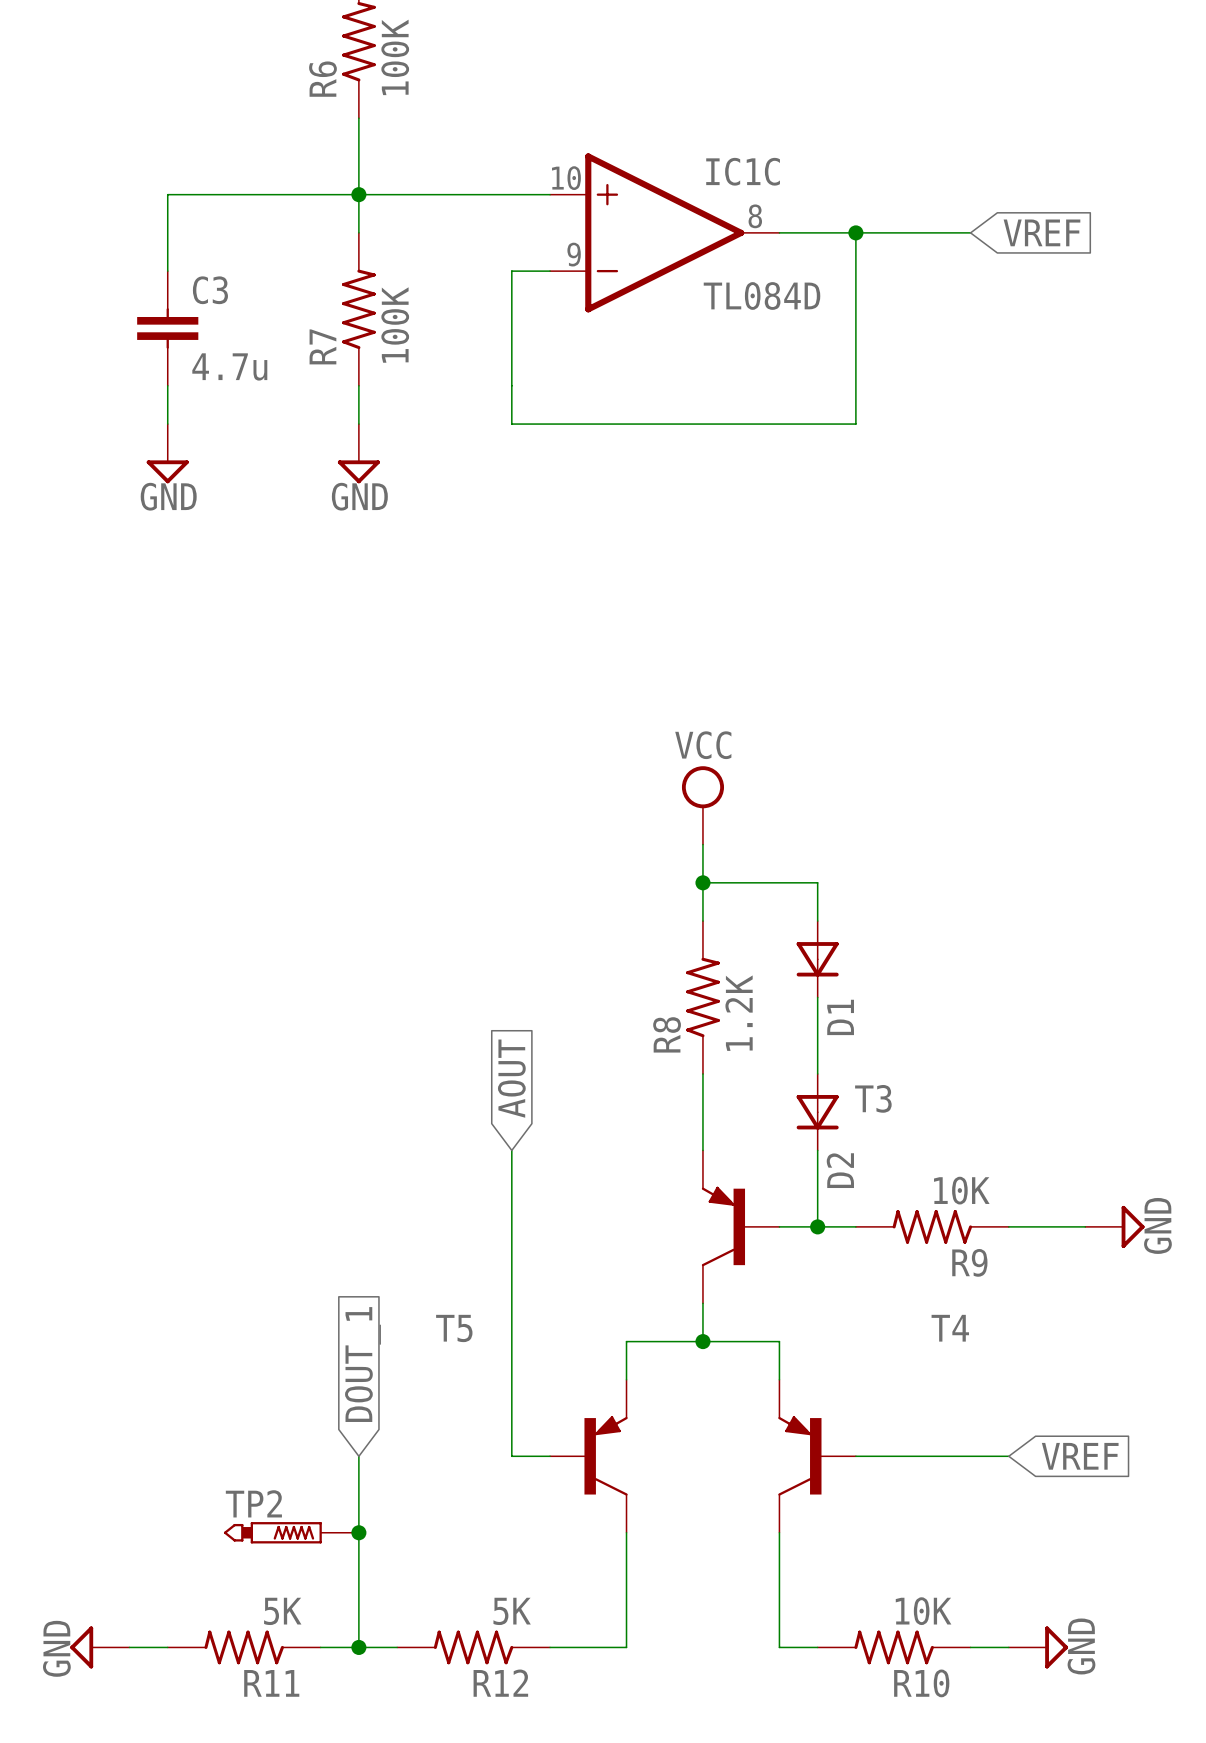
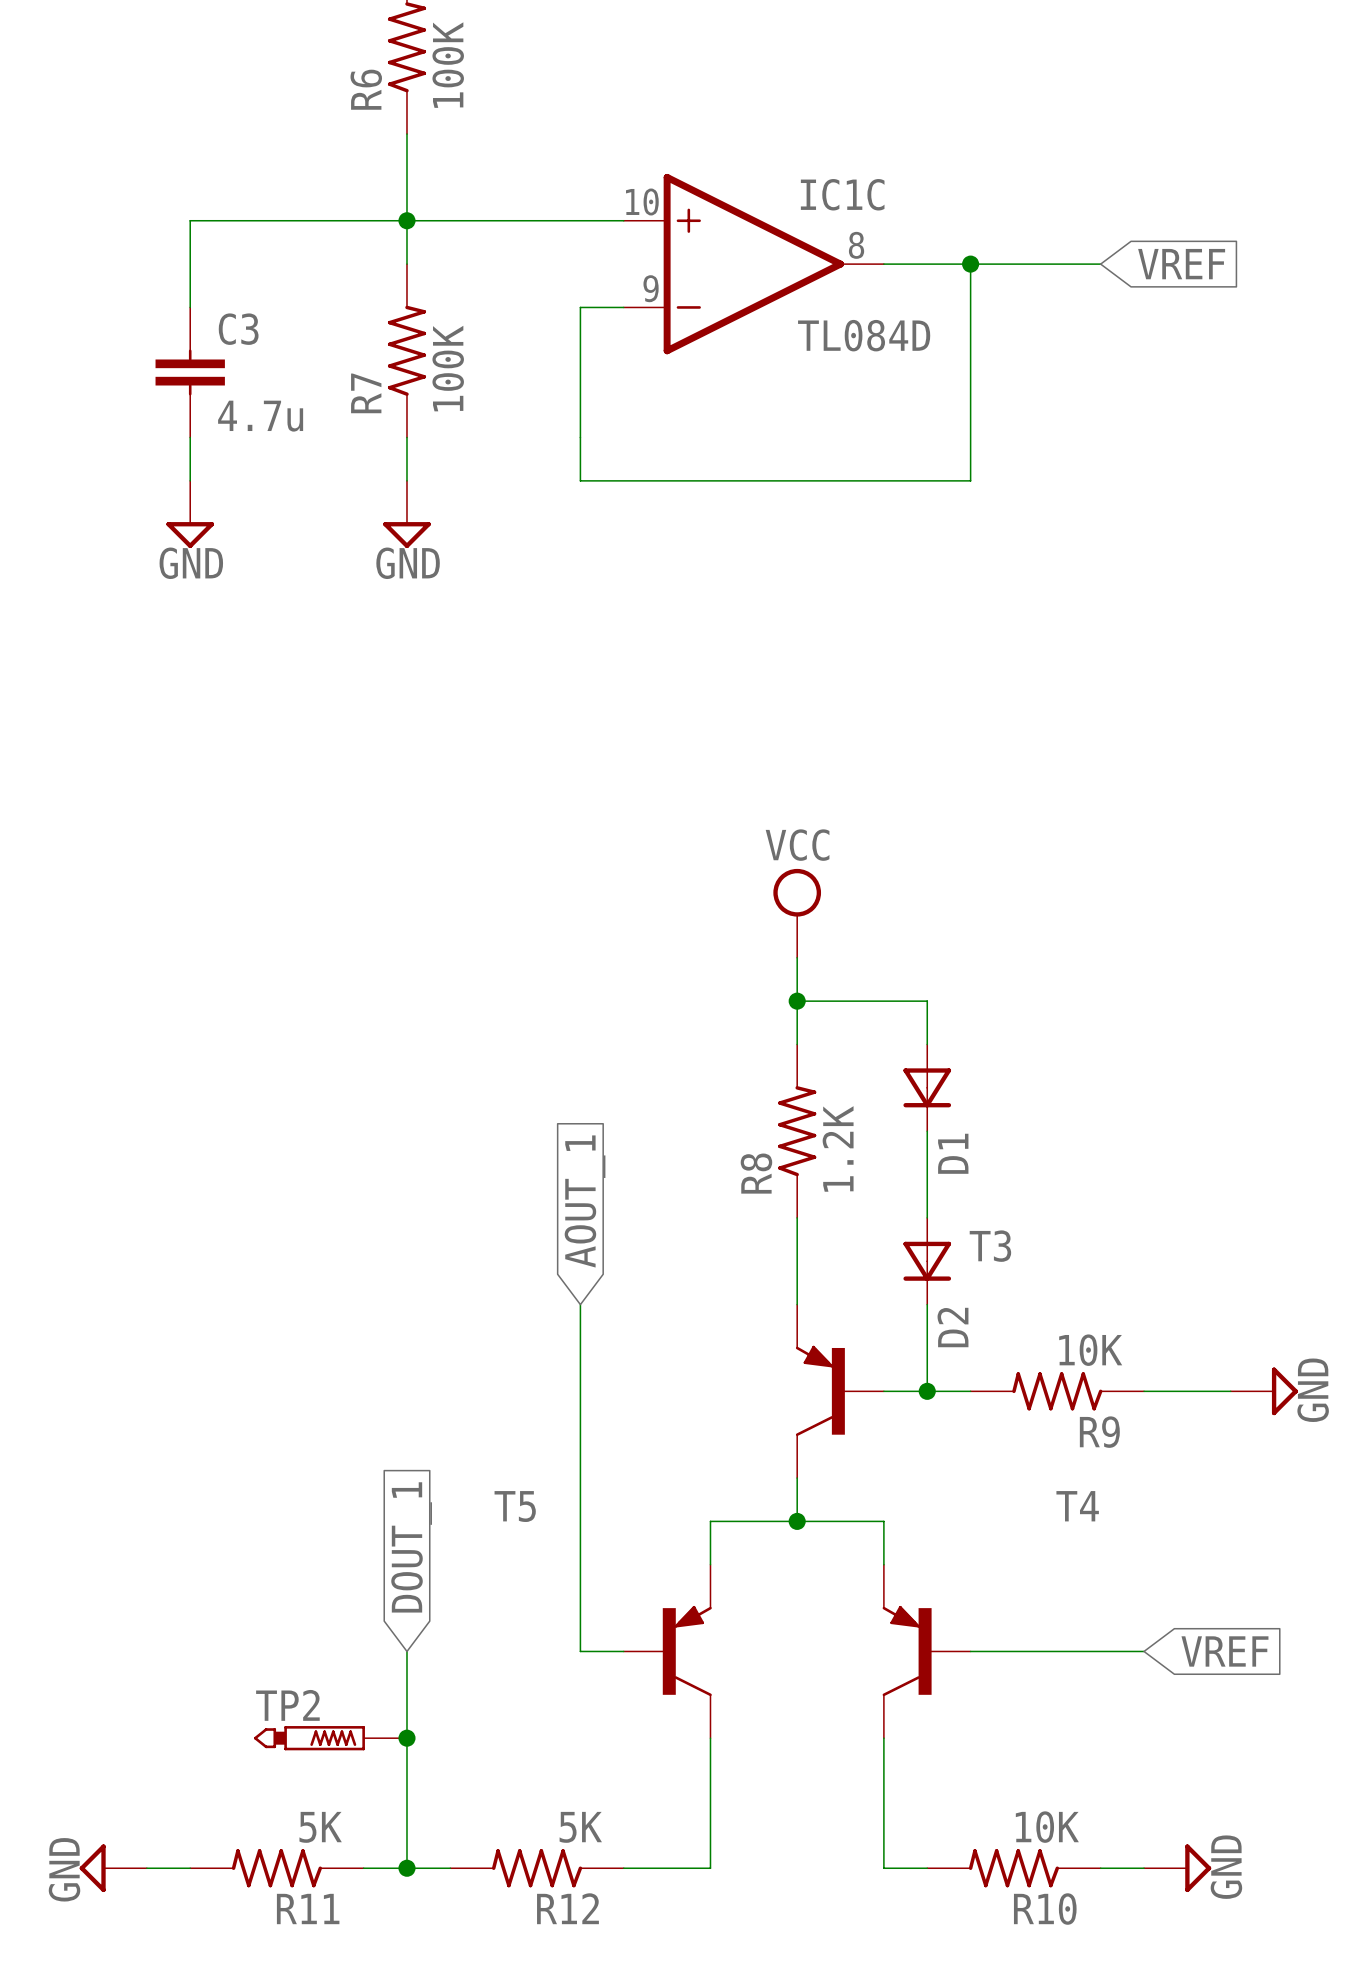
global label: AOUT (511, 1078) -> AOUT_1 (585, 1201)

